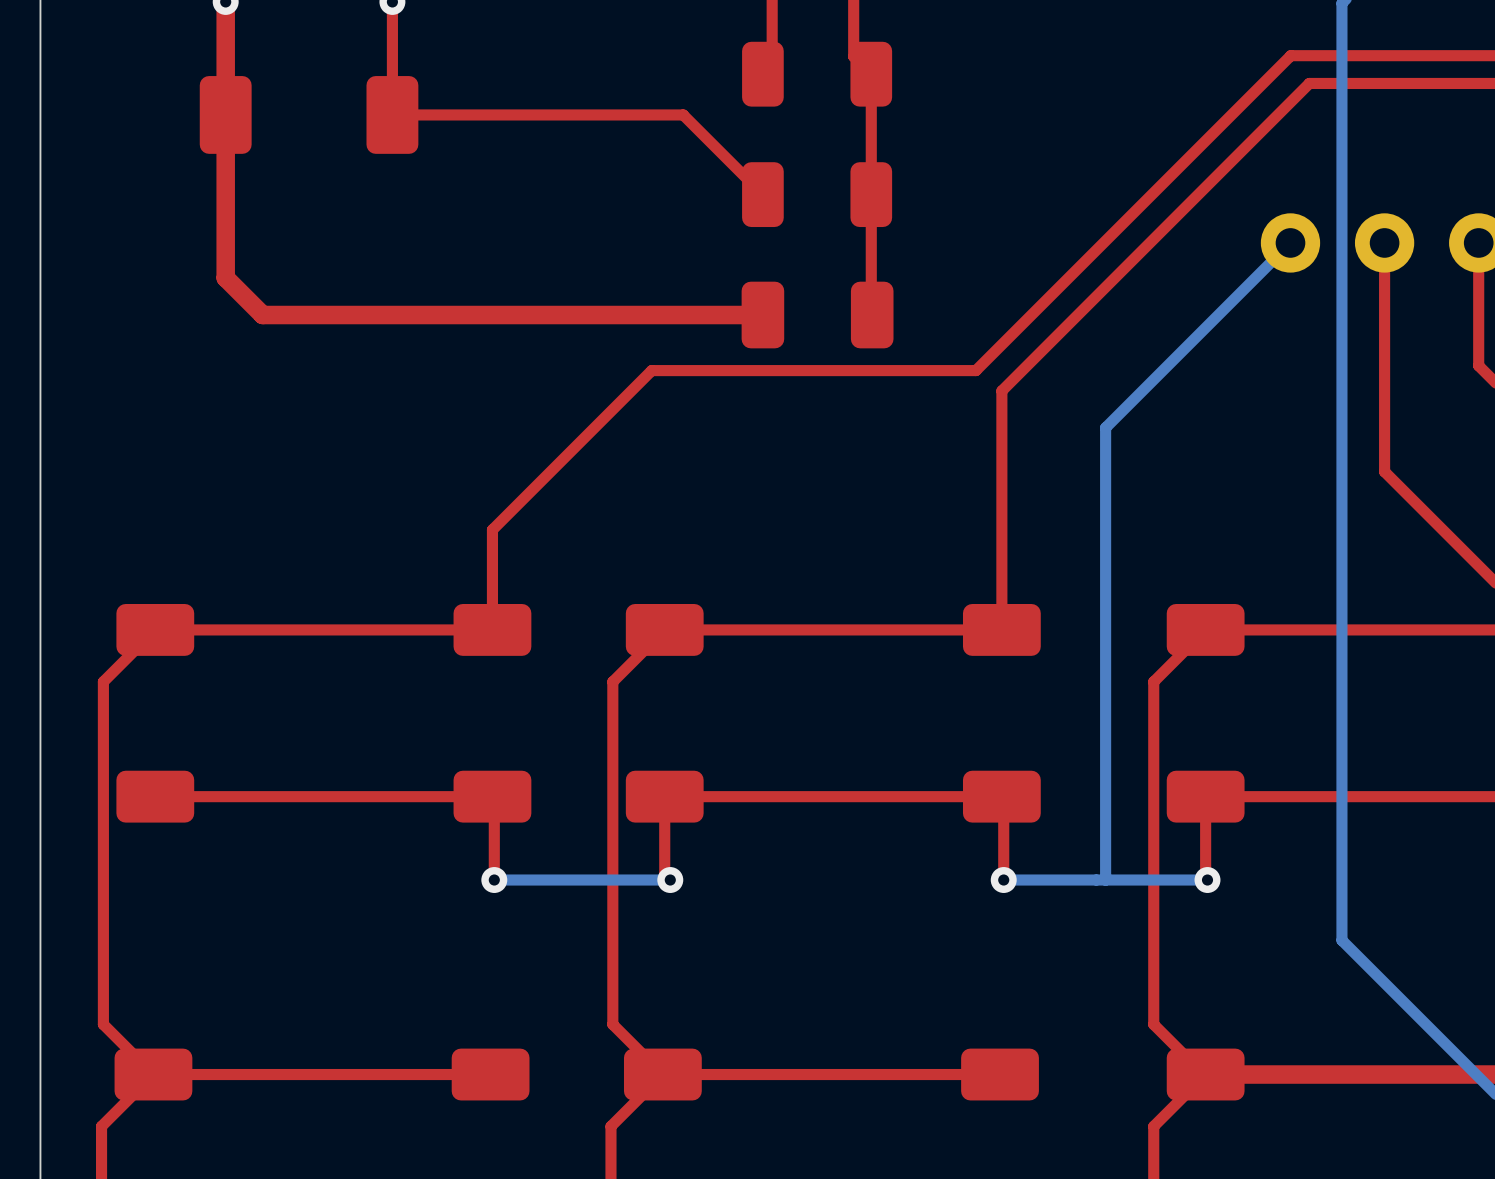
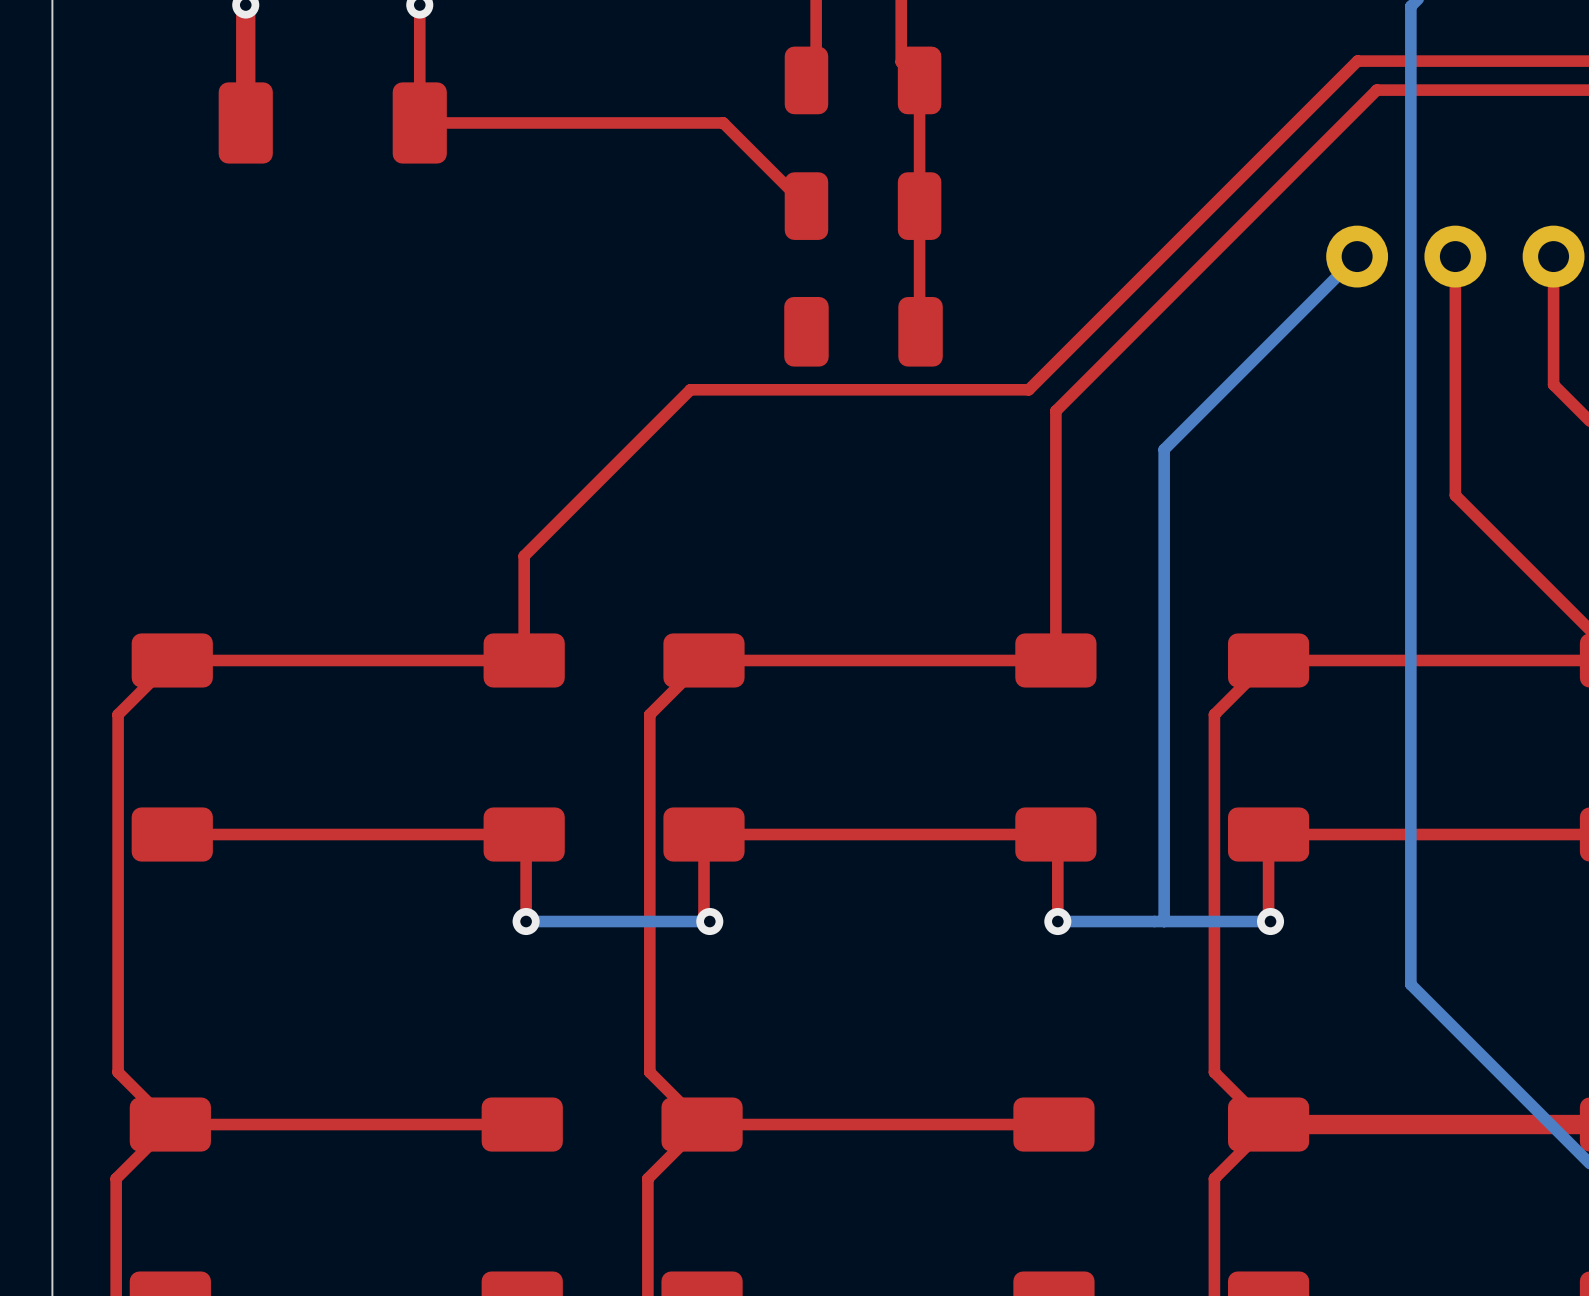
top track: (225, 114) (225, 277) (262, 315) (762, 315) -> none

